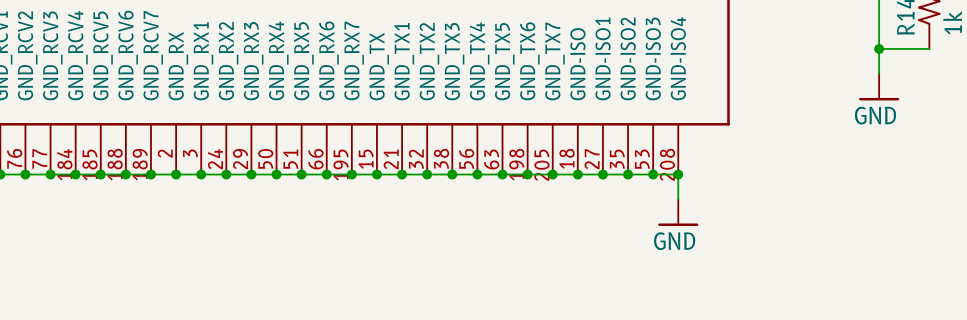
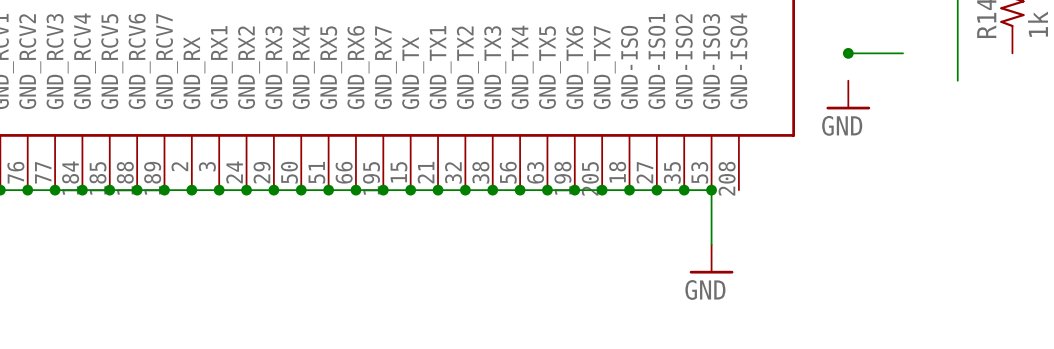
junction: none -> (848, 53)
wire: (879, 48) (929, 48) -> (848, 53) (903, 53)
junction: (879, 48) -> none
power symbol: none -> GND (848, 95)
power symbol: GND (879, 87) -> none
wire: (653, 174) (678, 174) (678, 199) -> (711, 190) (711, 244)
junction: (678, 174) -> none
power symbol position: GND (678, 212) -> GND (711, 259)

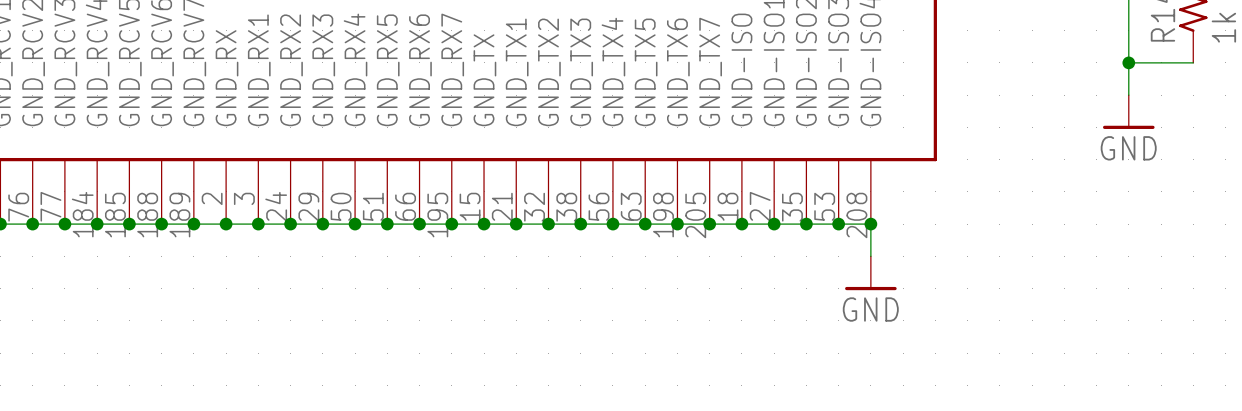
wire: (848, 53) (903, 53) -> (1128, 62) (1193, 62)
junction: (848, 53) -> none
junction: none -> (1128, 62)
power symbol: GND (848, 95) -> none
power symbol: none -> GND (1128, 112)
wire: (711, 190) (711, 244) -> (838, 224) (870, 224) (870, 256)
junction: none -> (870, 224)
power symbol position: GND (711, 259) -> GND (870, 273)

